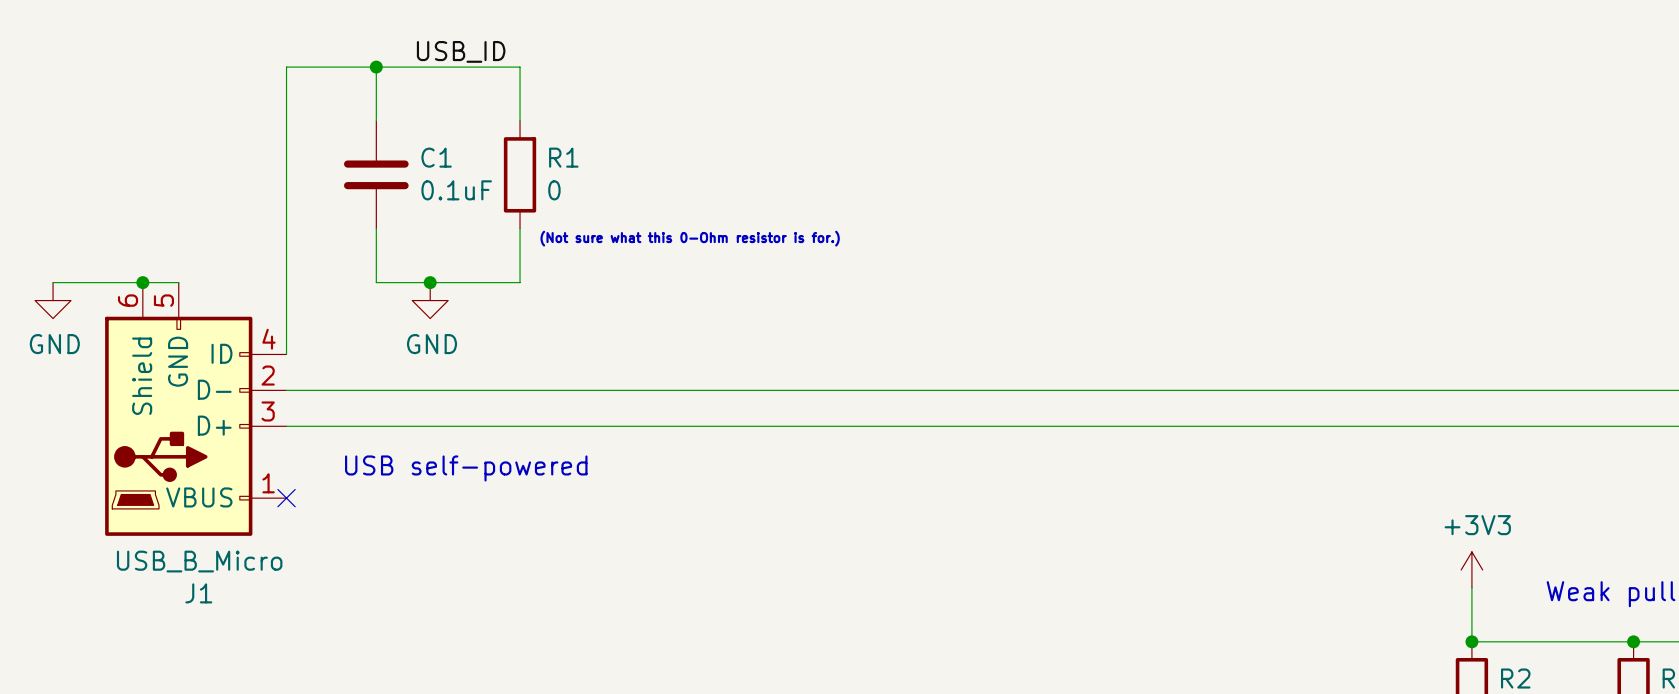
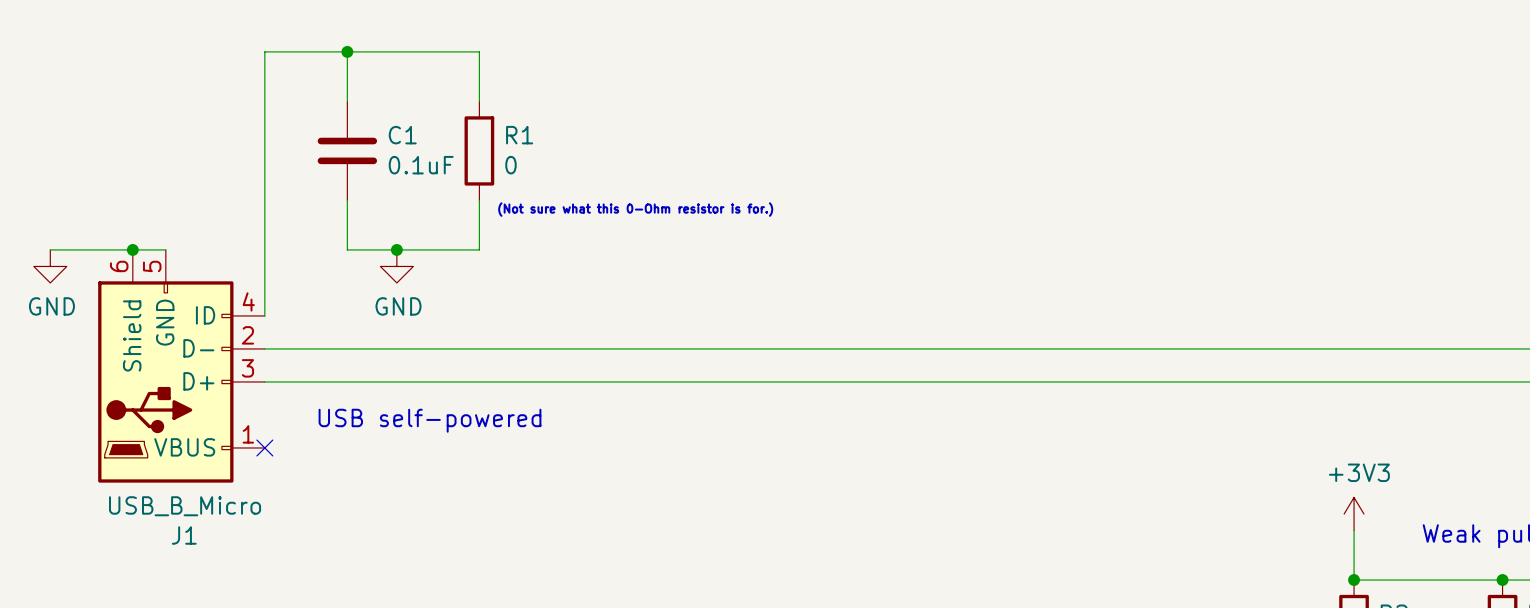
label: USB_ID (461, 51) -> none

